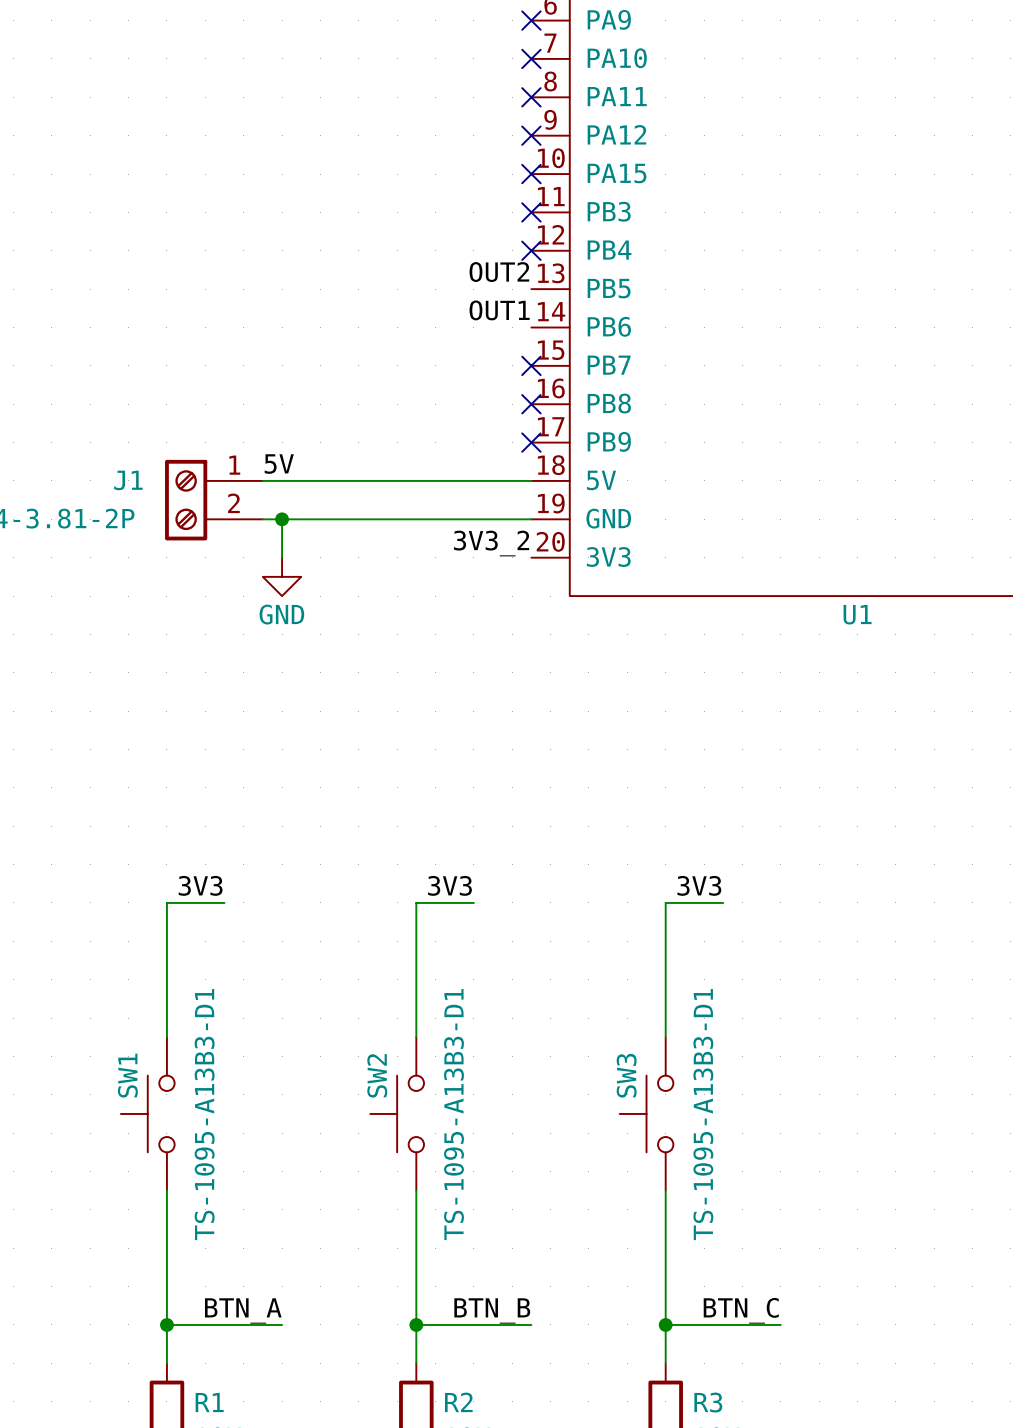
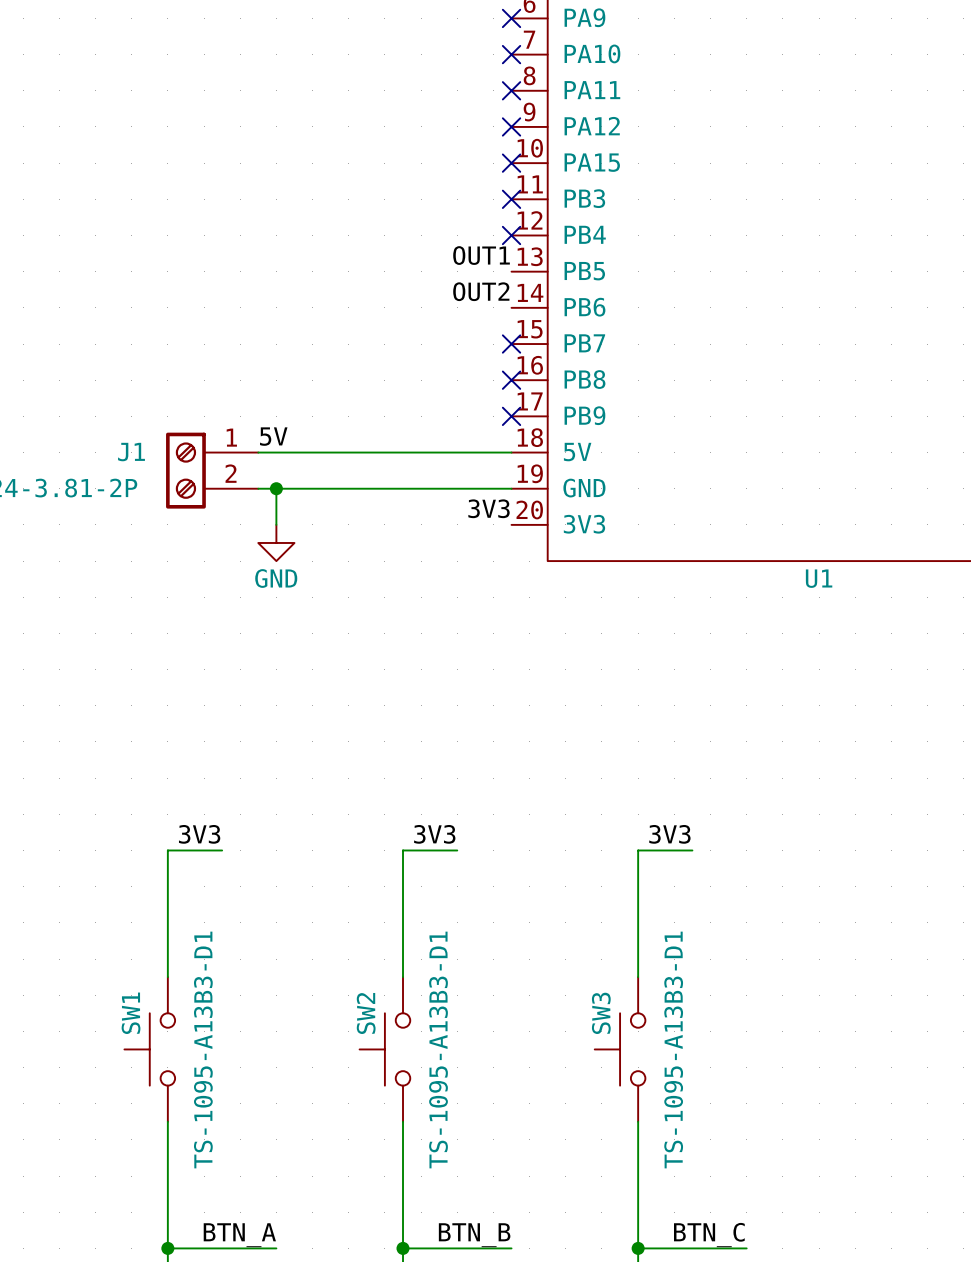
label: OUT2 (499, 272) -> OUT1 (481, 255)
label: OUT1 (499, 310) -> OUT2 (481, 291)
label: 3V3_2 (491, 543) -> 3V3 (489, 508)

